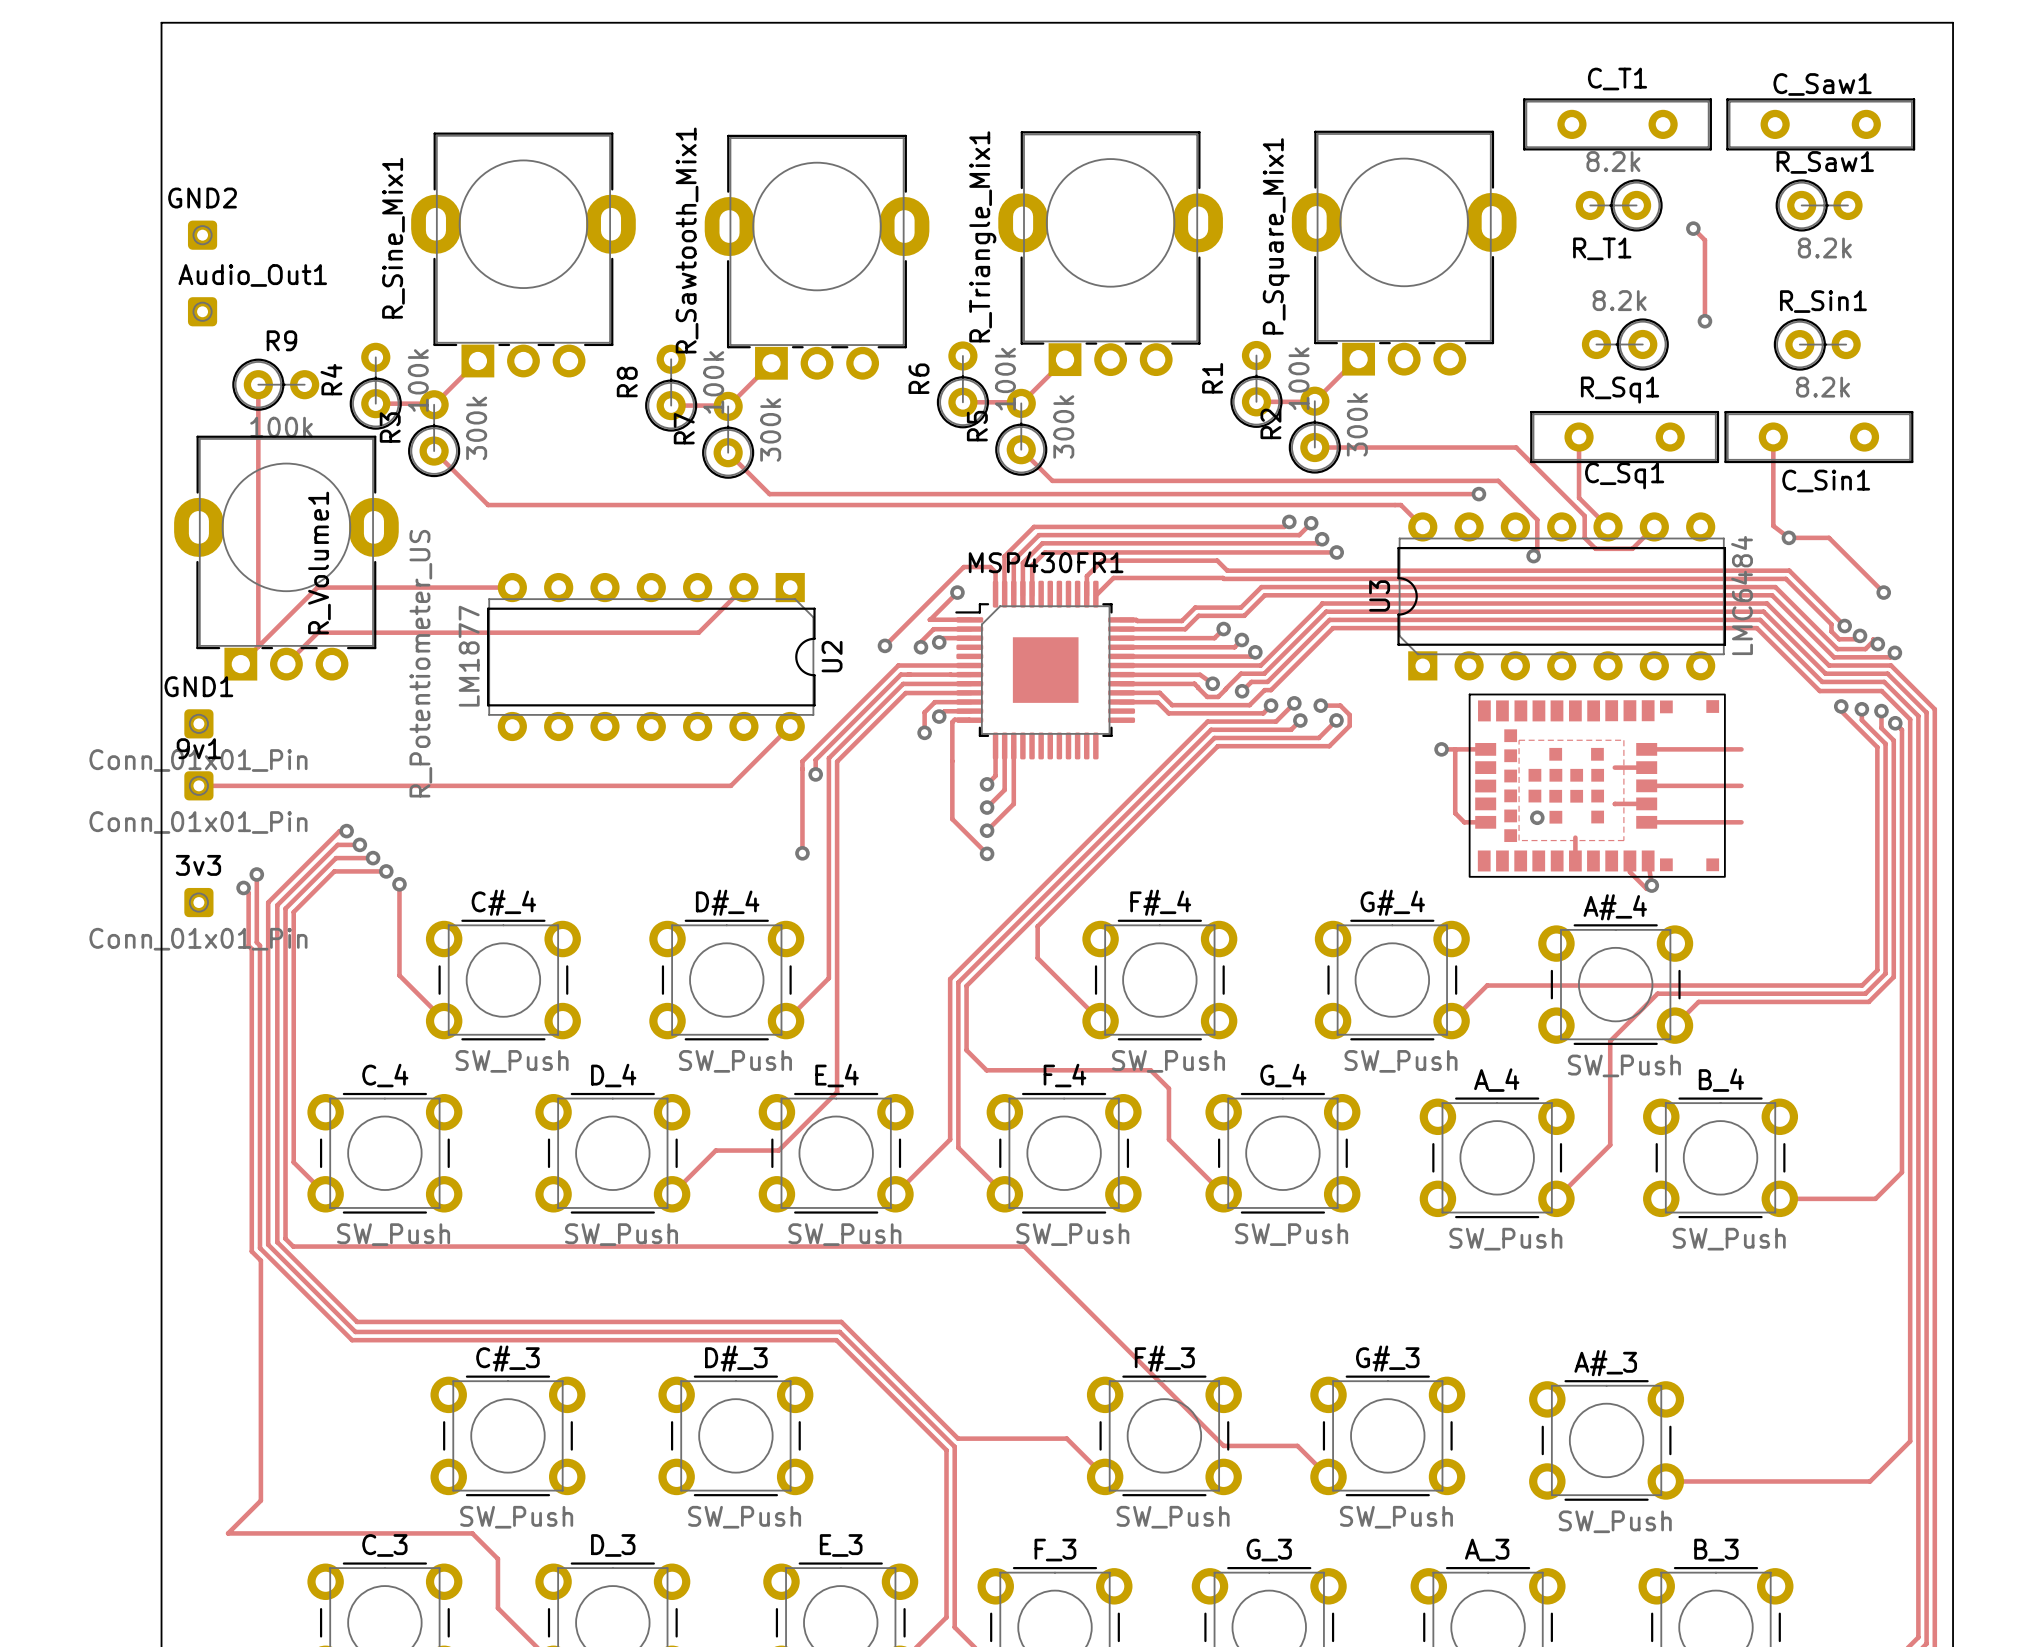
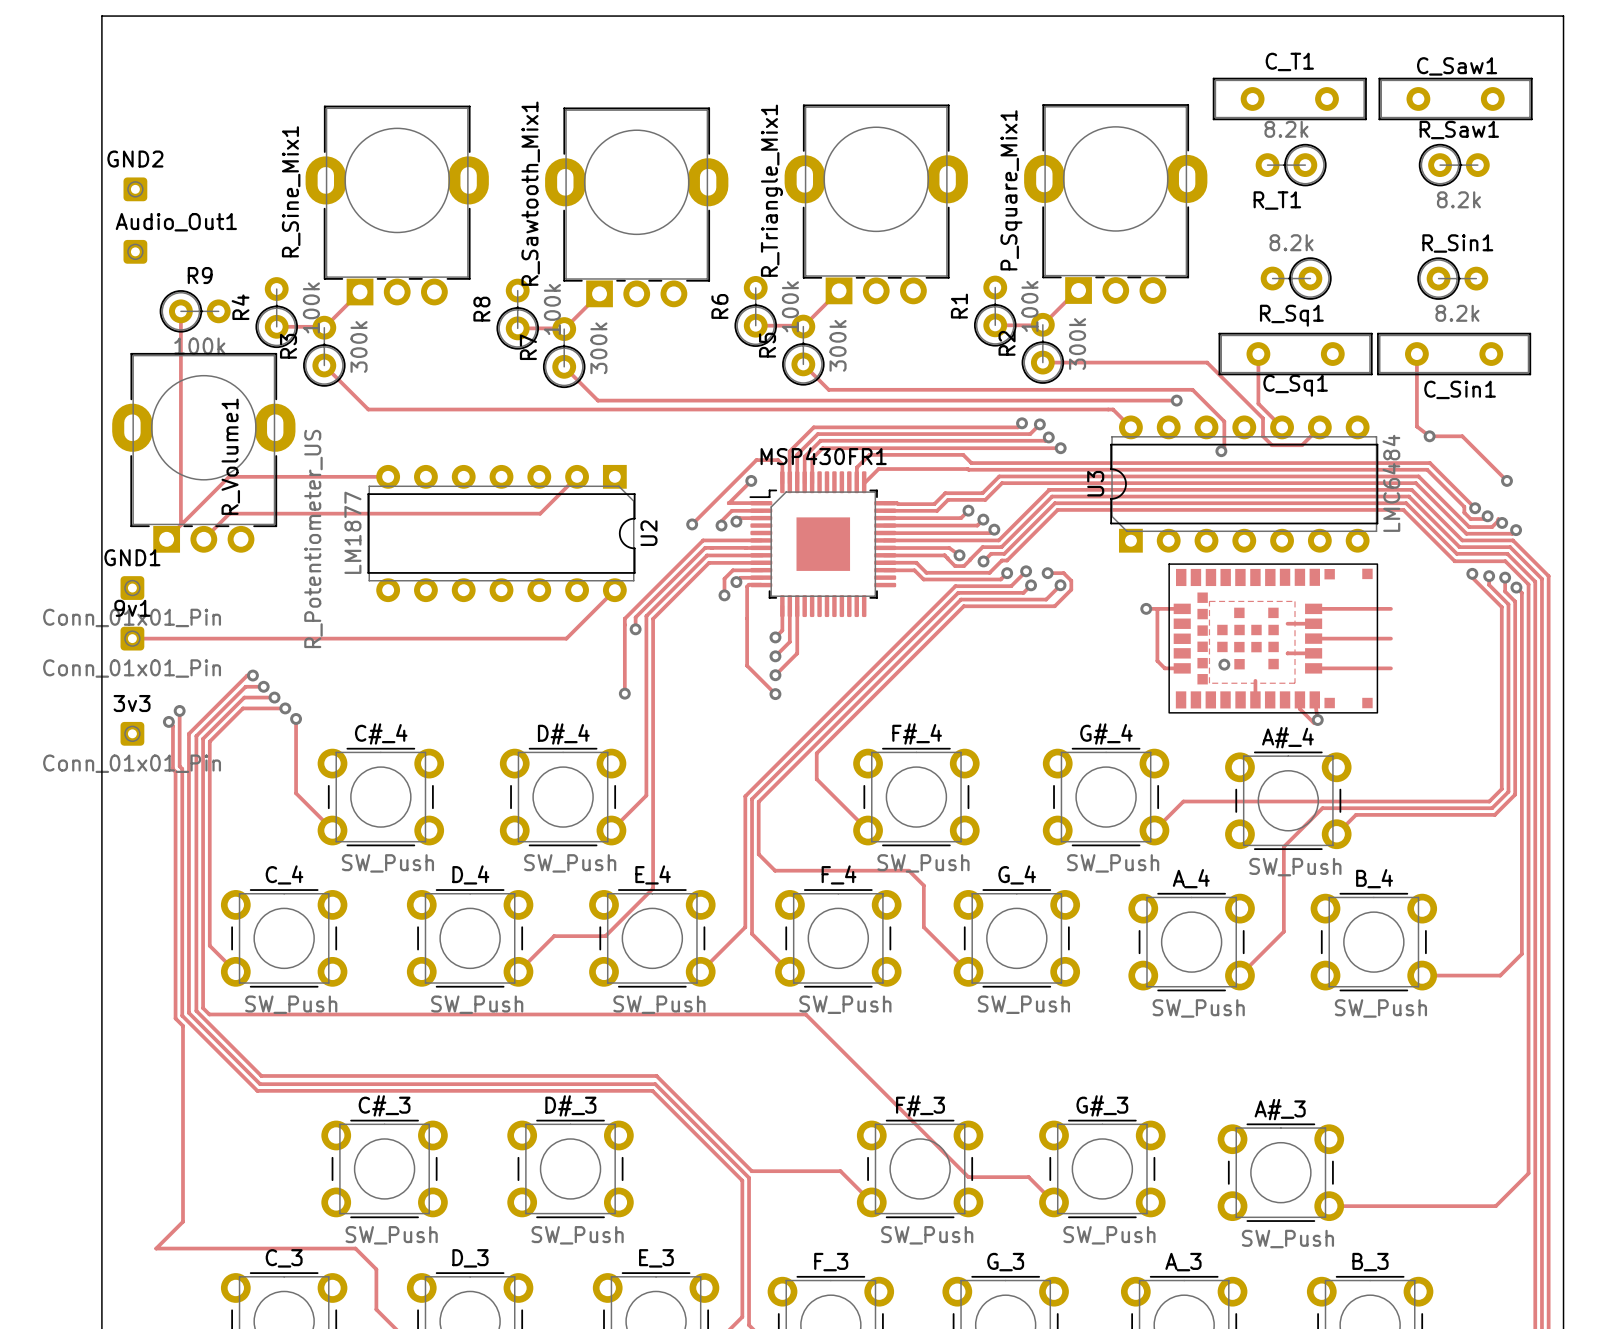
track: (1693, 228) (1704, 240) (1704, 321) -> none
via: (1693, 228) -> none
via: (1704, 321) -> none

